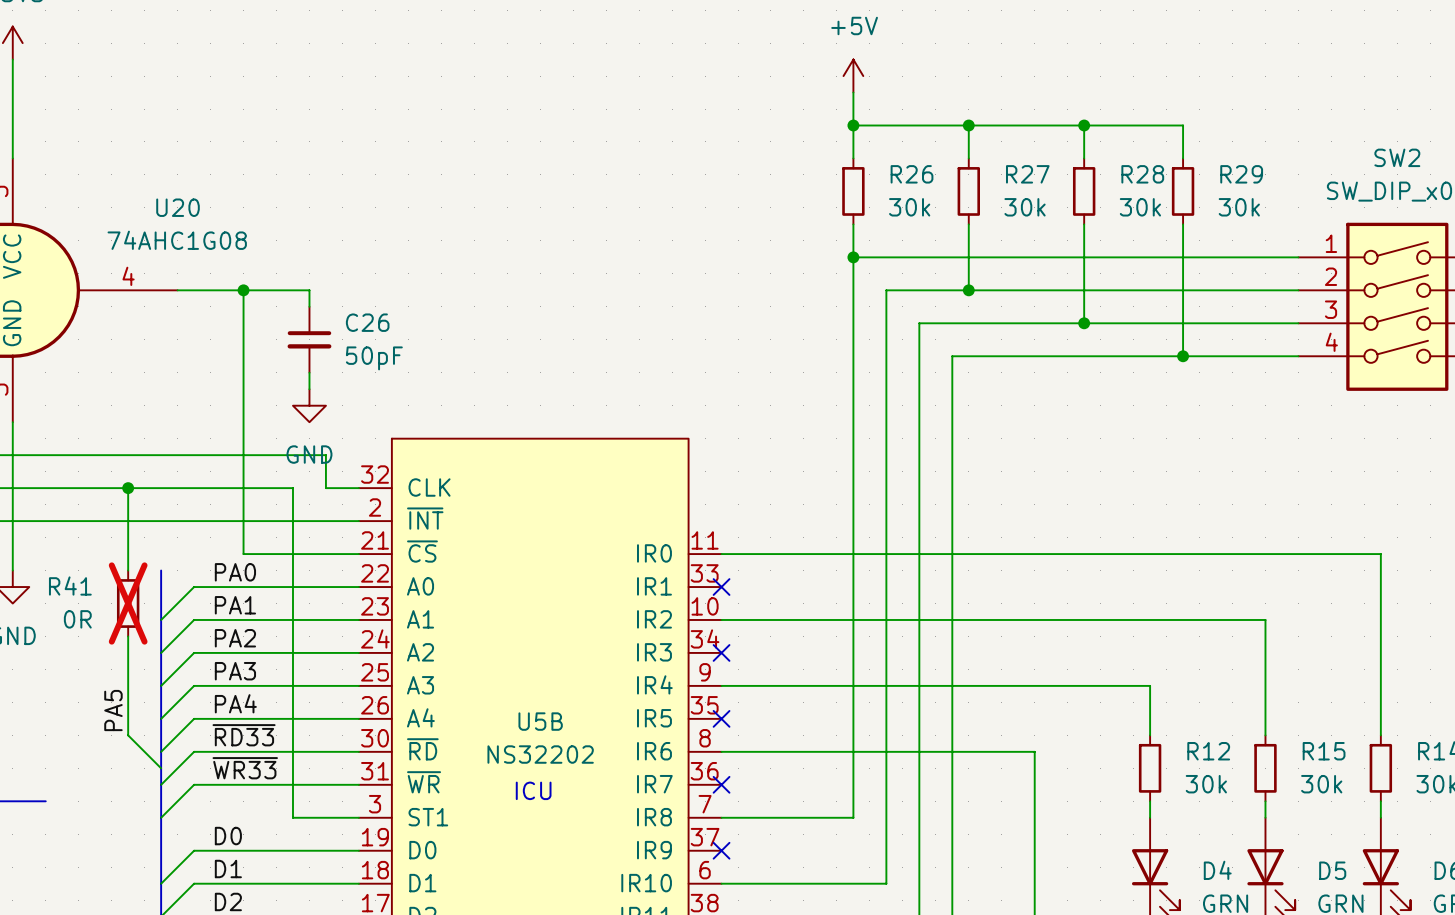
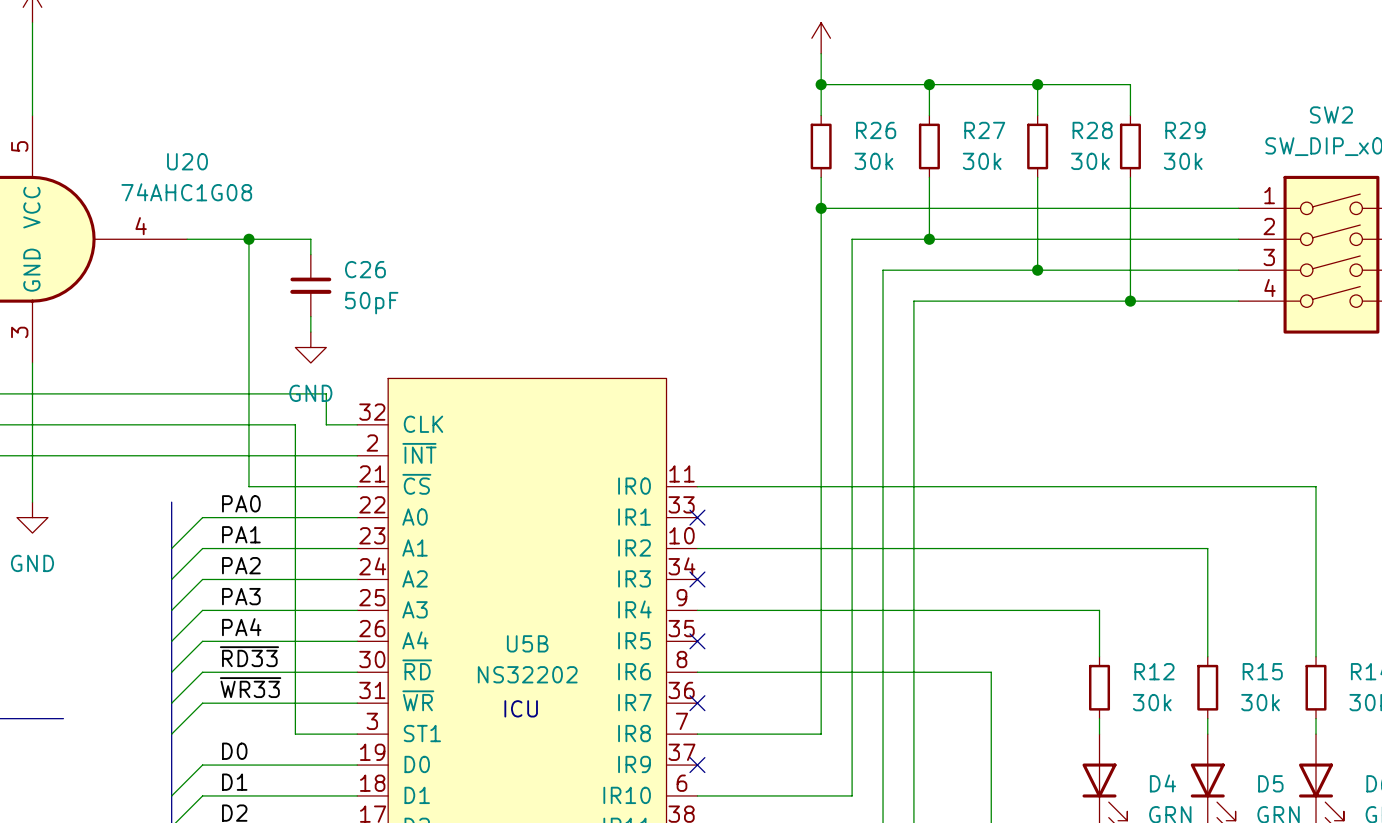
wire: (128, 488) (128, 570) -> none
junction: (128, 488) -> none
R41: 0R (128, 603) -> none
wire: (128, 636) (128, 735) (161, 768) -> none
label: PA5 (113, 710) -> none

